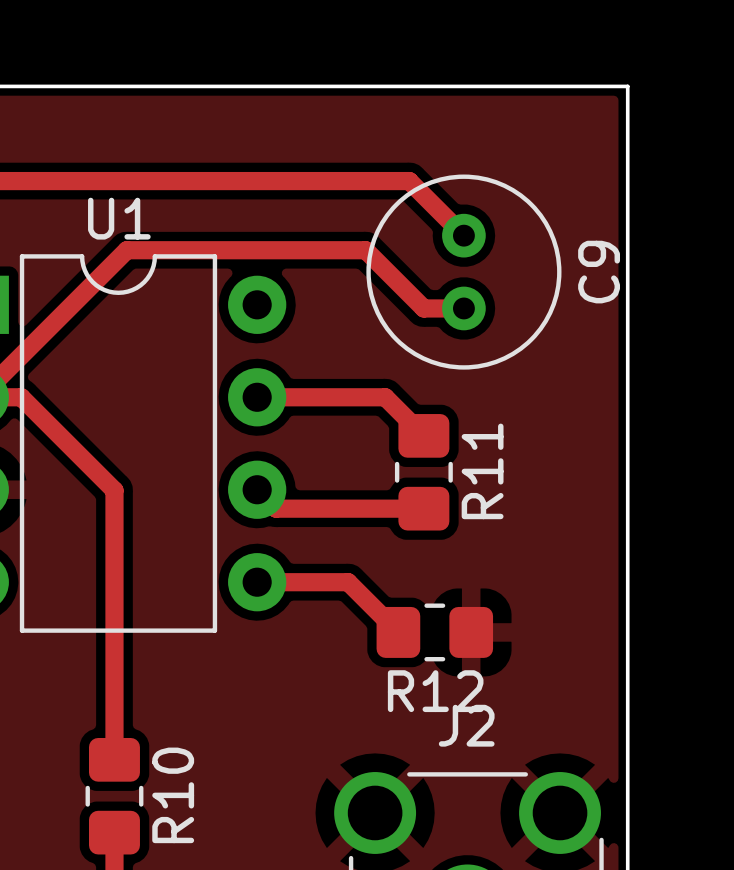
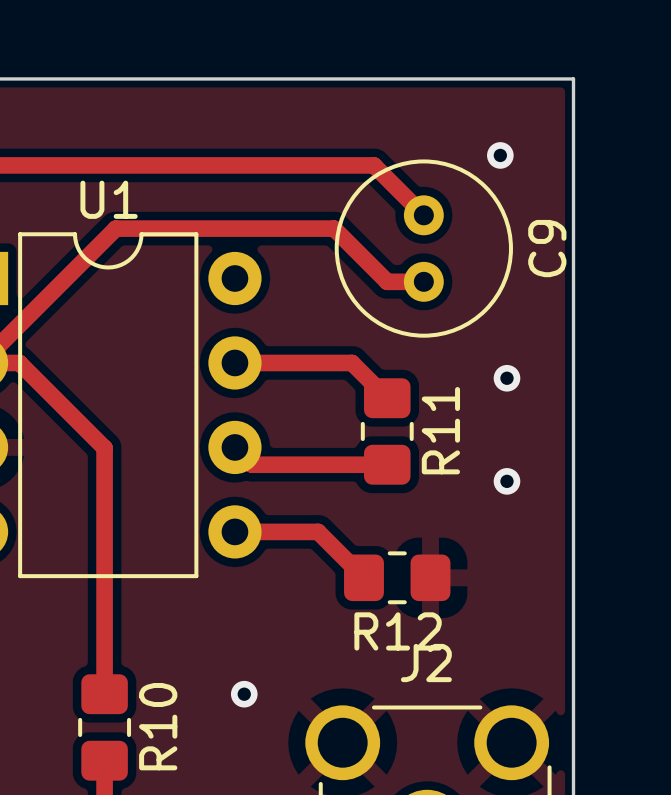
via: none -> (500, 155)
via: none -> (506, 378)
via: none -> (506, 481)
via: none -> (244, 694)

